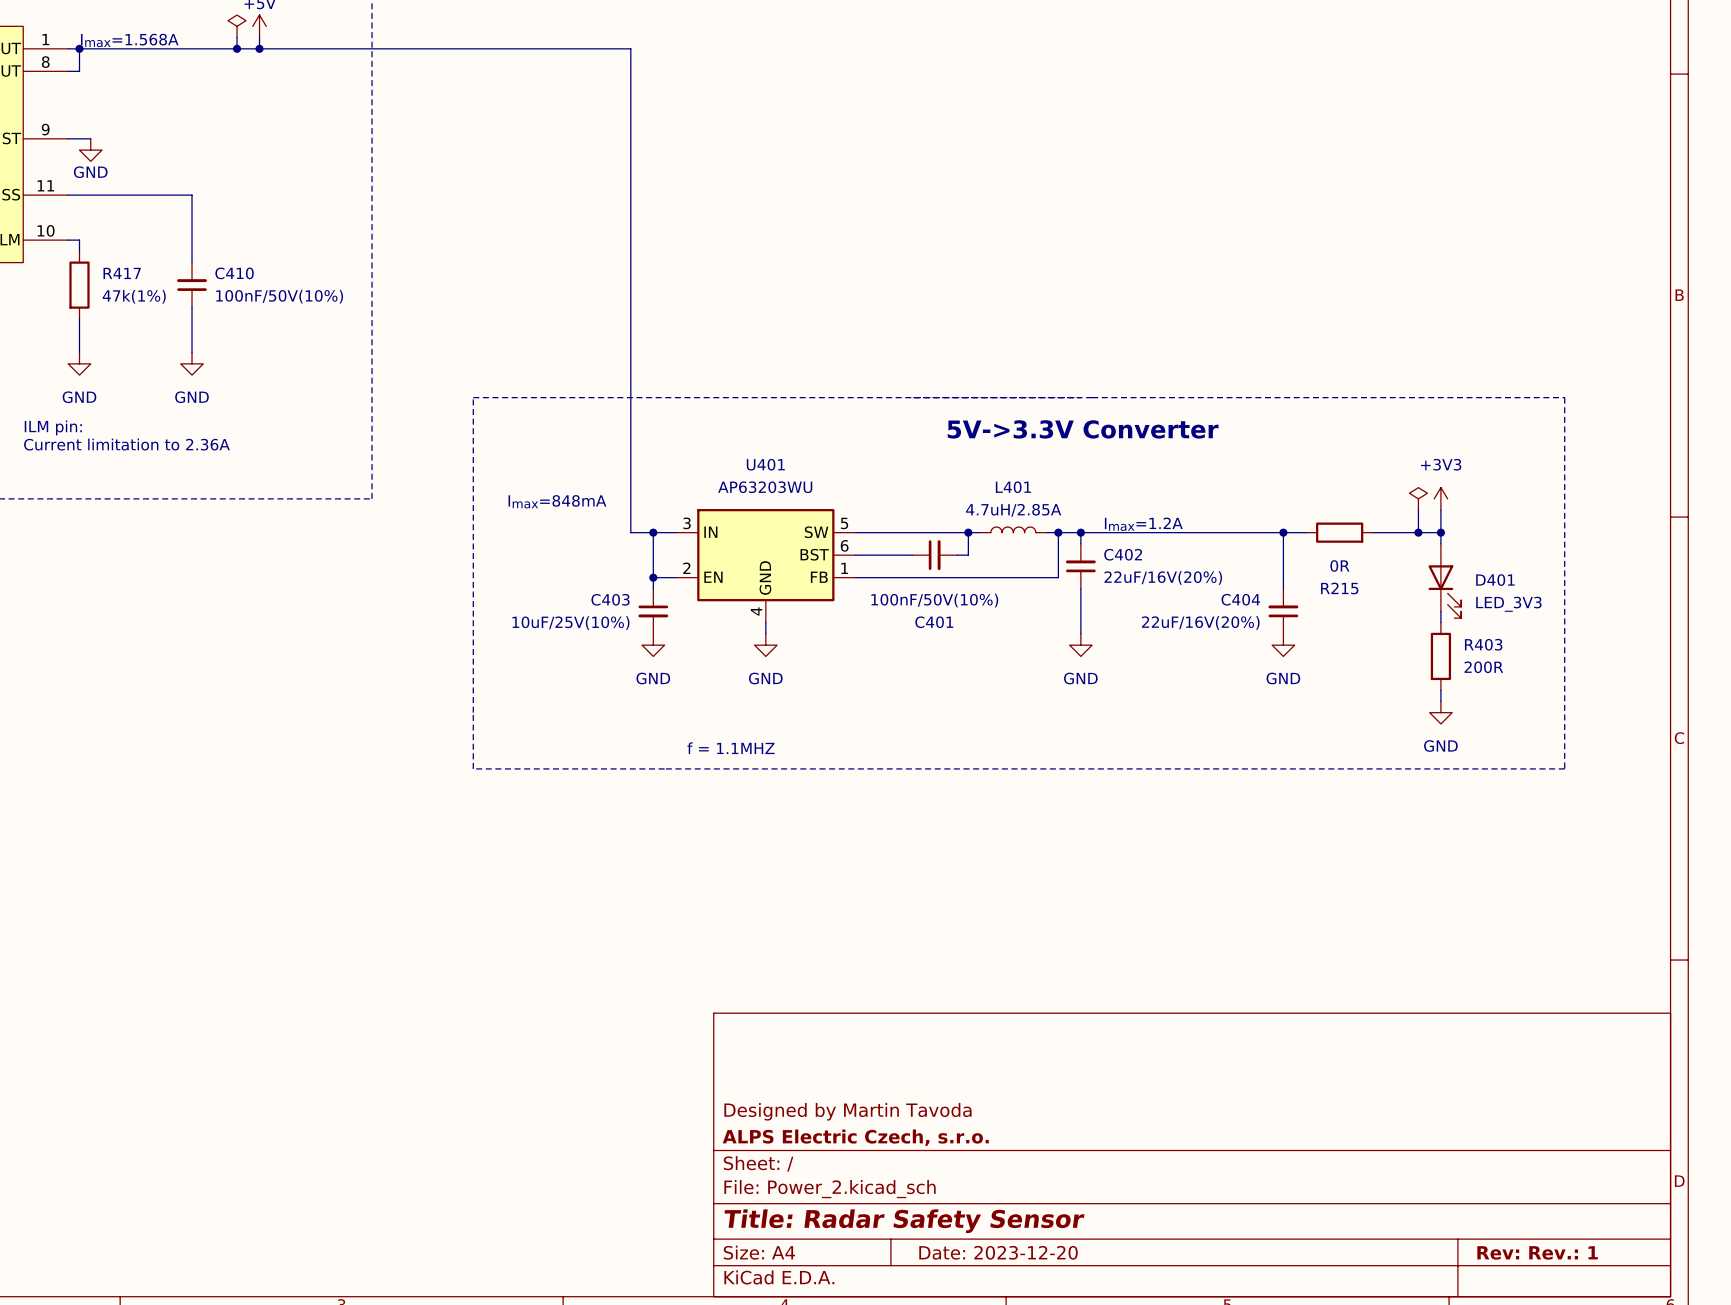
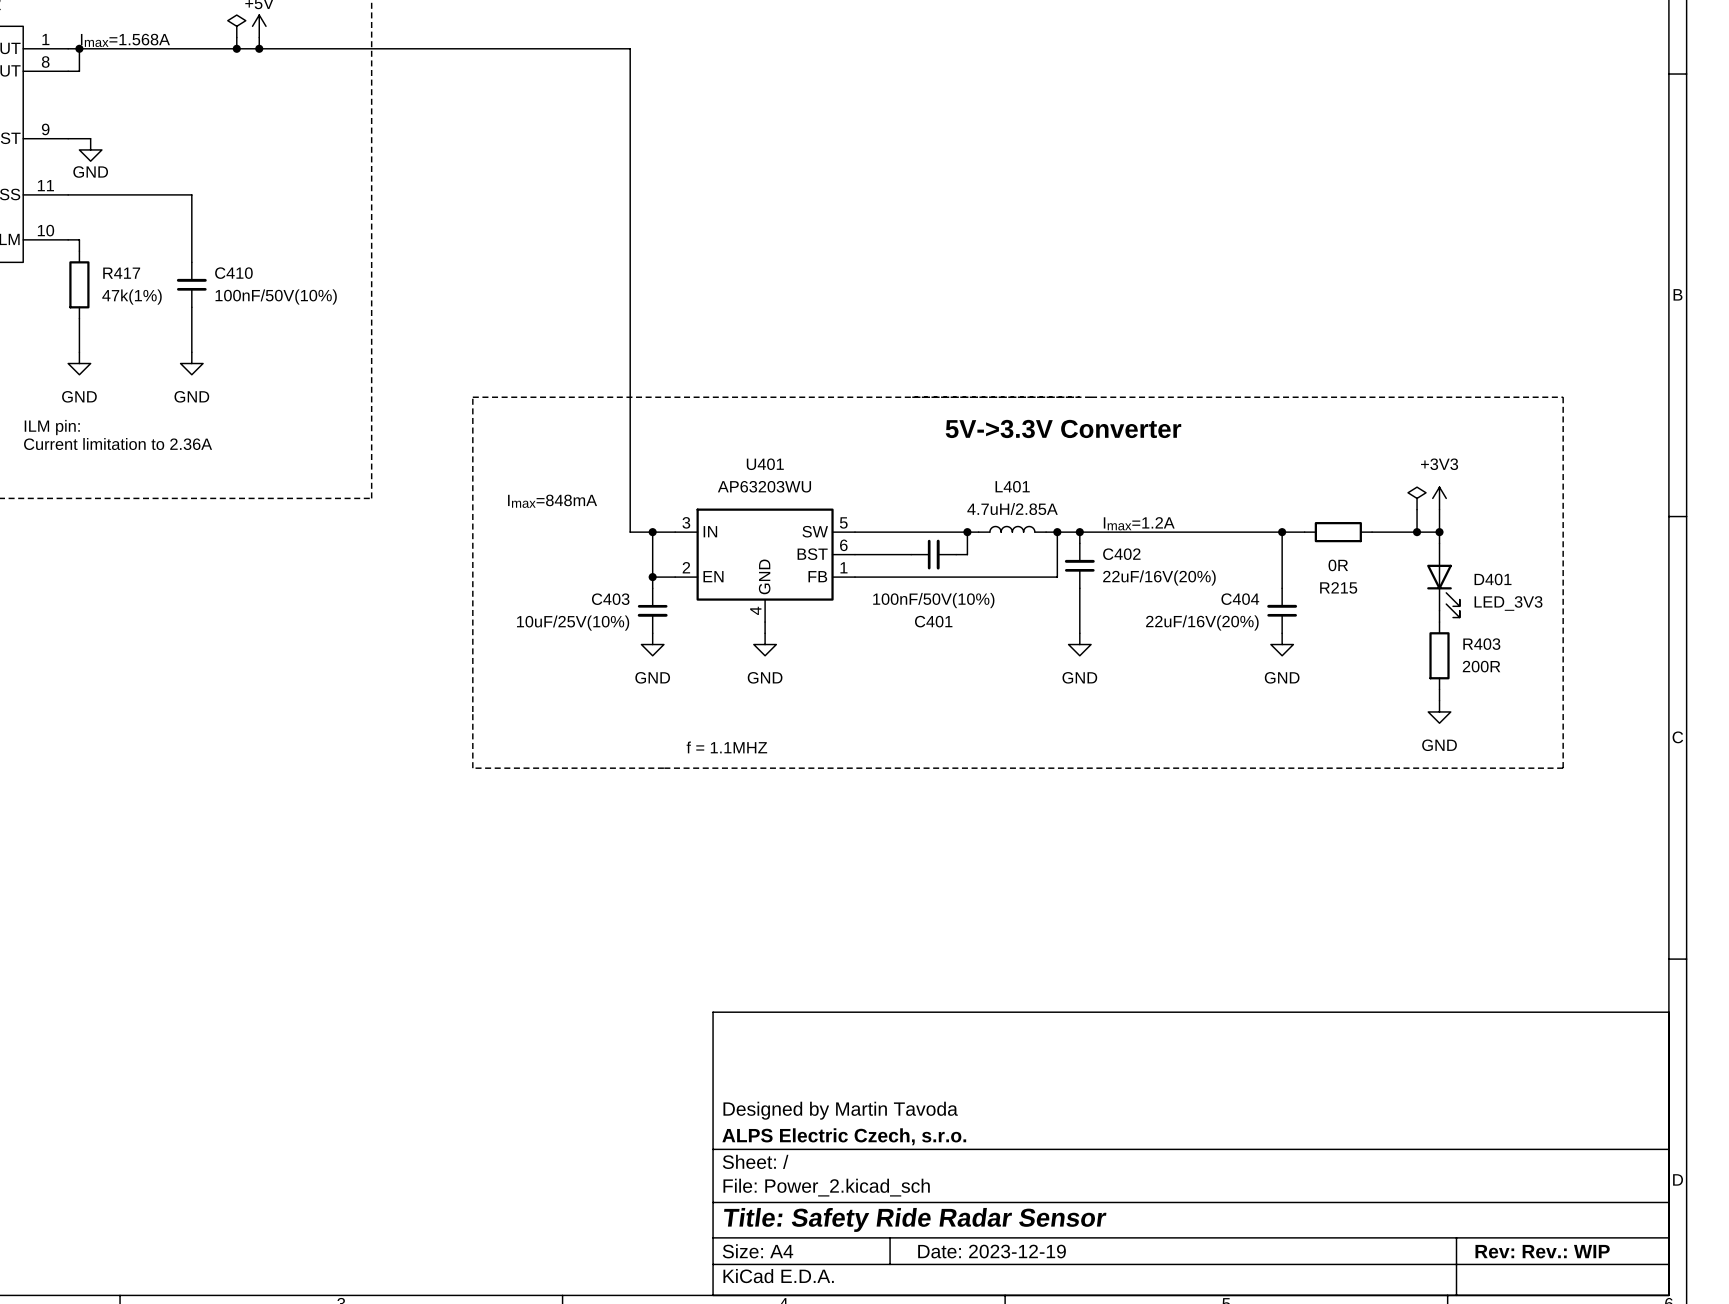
title block: Title: Radar Safety Sensor (904, 1221) -> Title: Safety Ride Radar Sensor (915, 1219)
title block: Date: 2023-12-20 (998, 1252) -> Date: 2023-12-19 (992, 1251)
title block: Rev: Rev.: 1 (1537, 1252) -> Rev: Rev.: WIP (1542, 1251)

